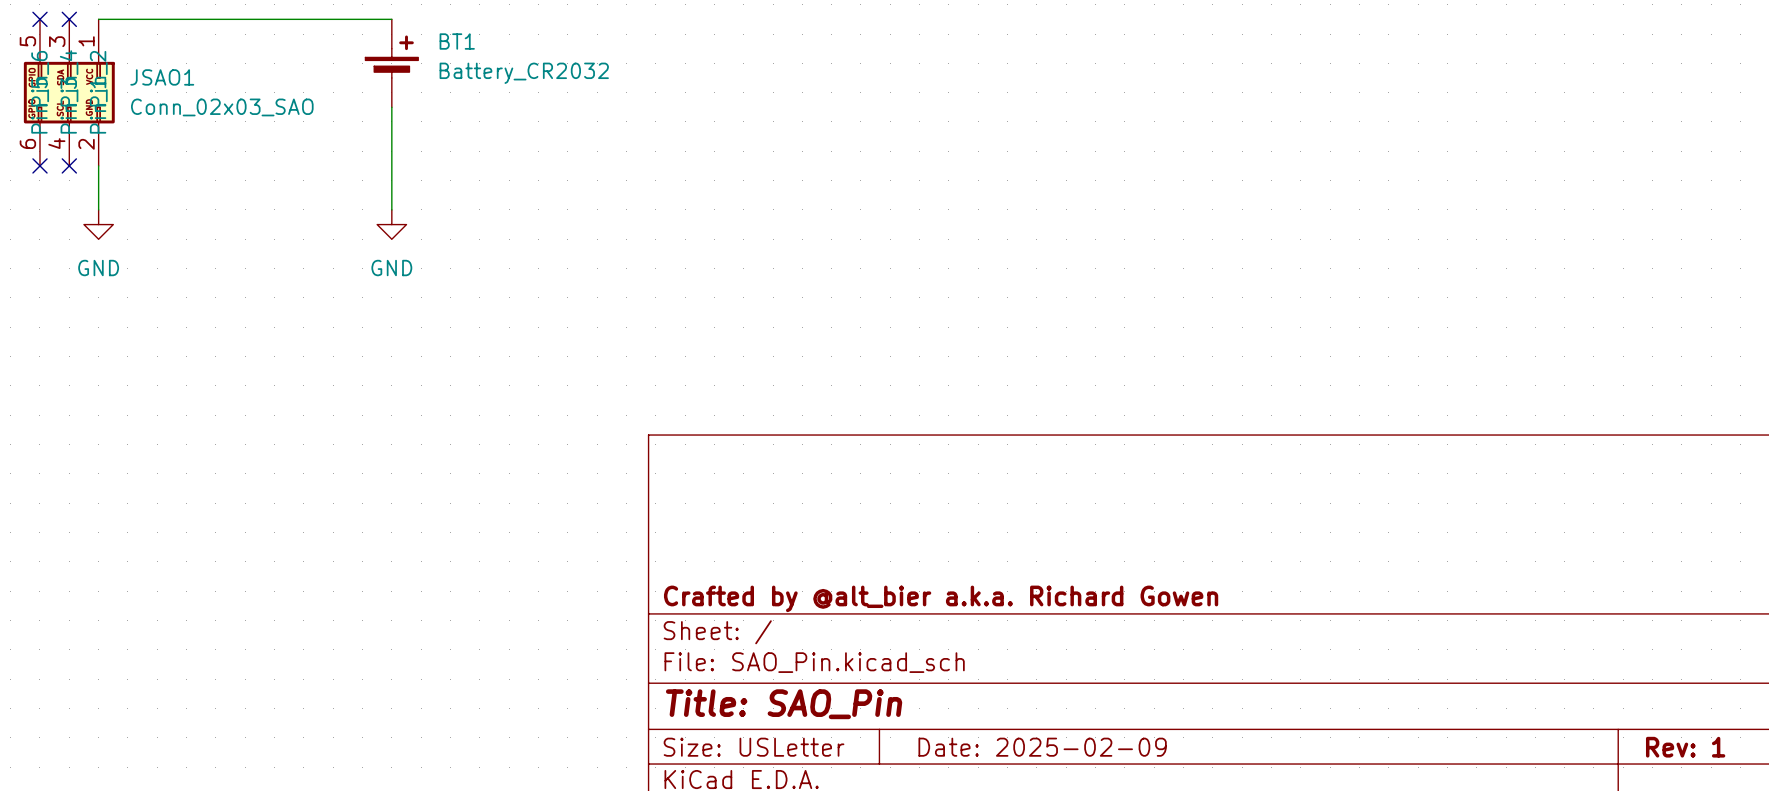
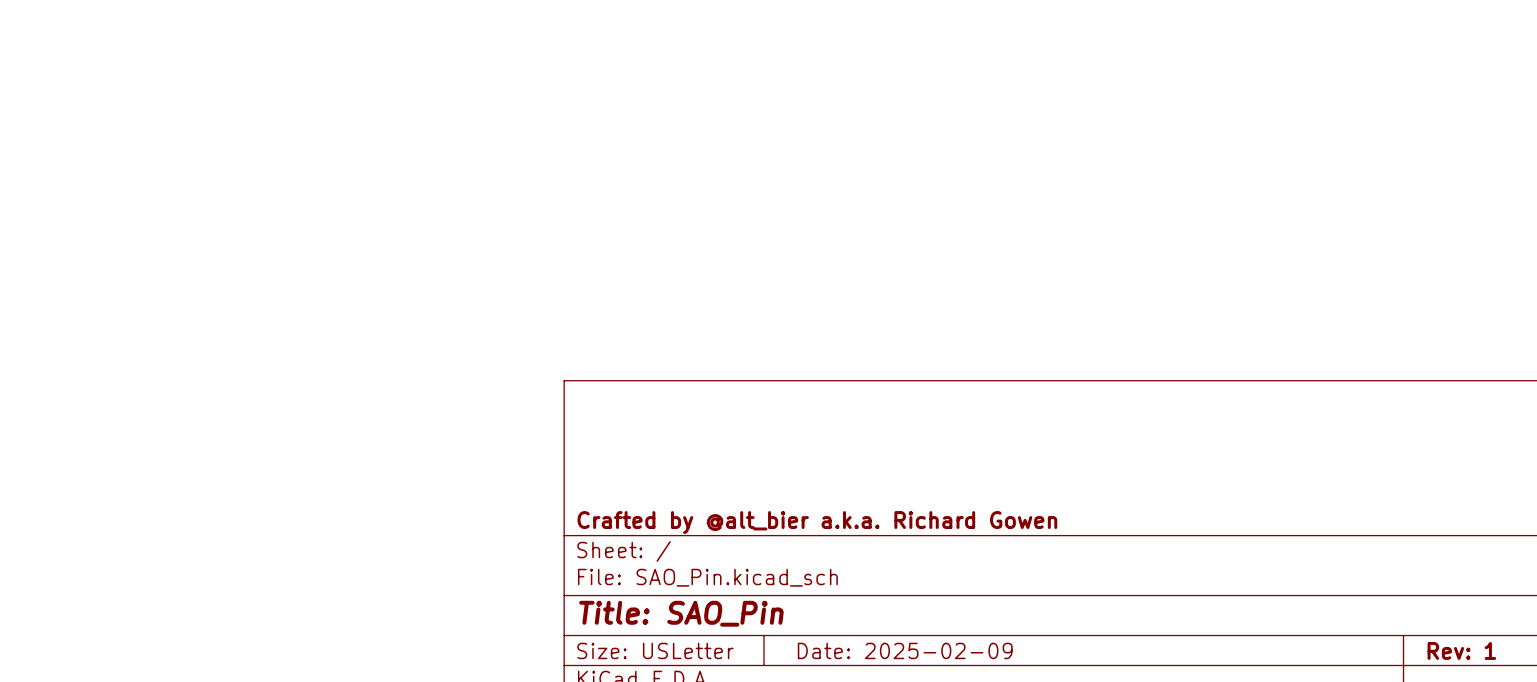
no-connect mark: (39, 19) -> none
no-connect mark: (69, 19) -> none
wire: (98, 19) (391, 19) -> none
BT1: Battery_CR2032 (391, 63) -> none
JSAO1: Conn_02x03_SAO (69, 92) -> none
wire: (391, 107) (391, 209) -> none
no-connect mark: (39, 165) -> none
no-connect mark: (69, 165) -> none
wire: (98, 165) (98, 209) -> none
power symbol: GND (98, 224) -> none
power symbol: GND (391, 224) -> none

